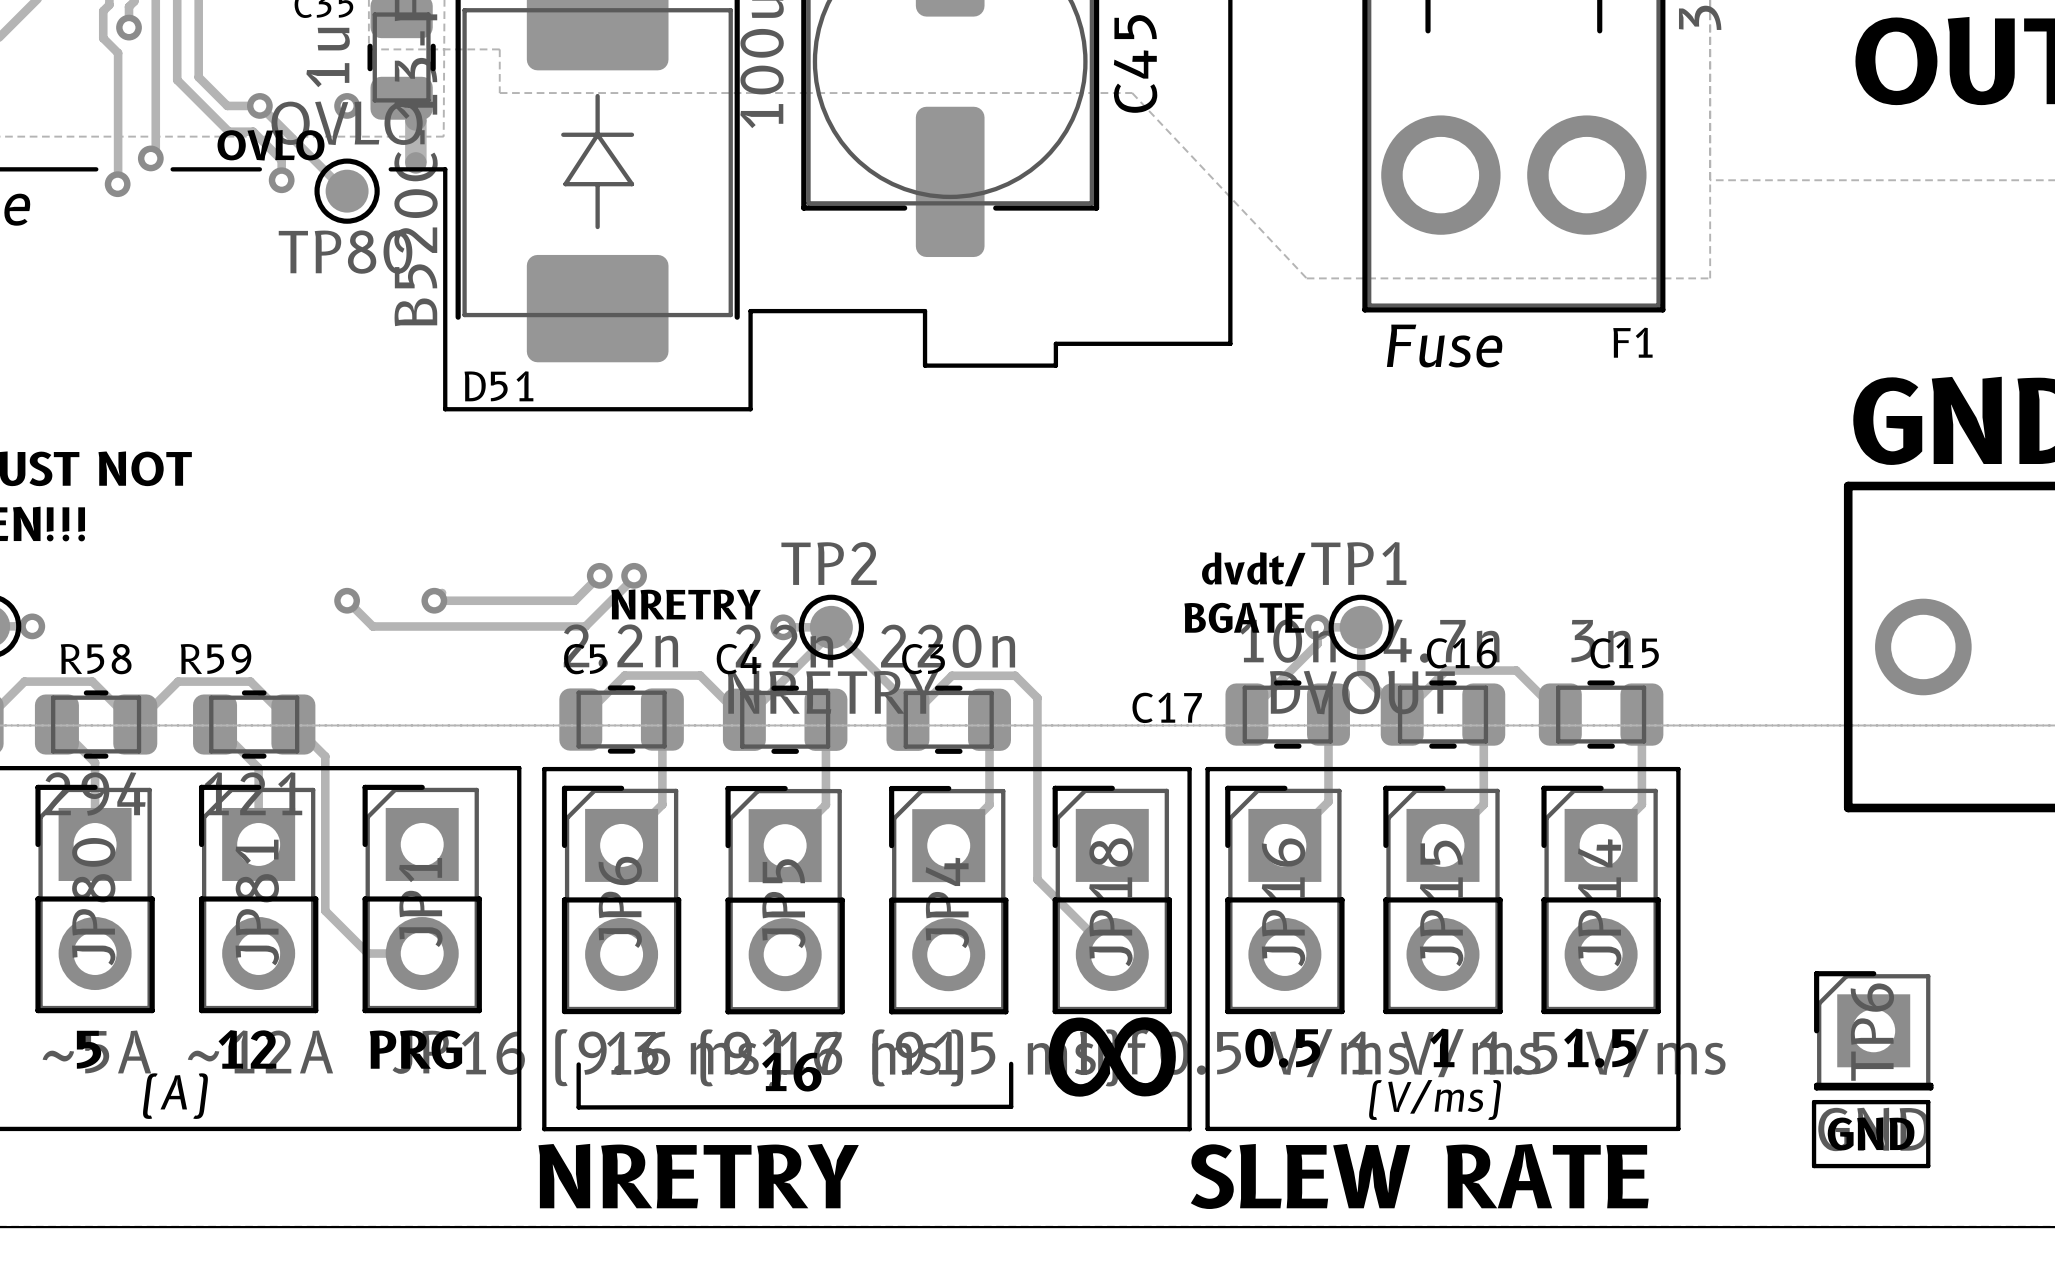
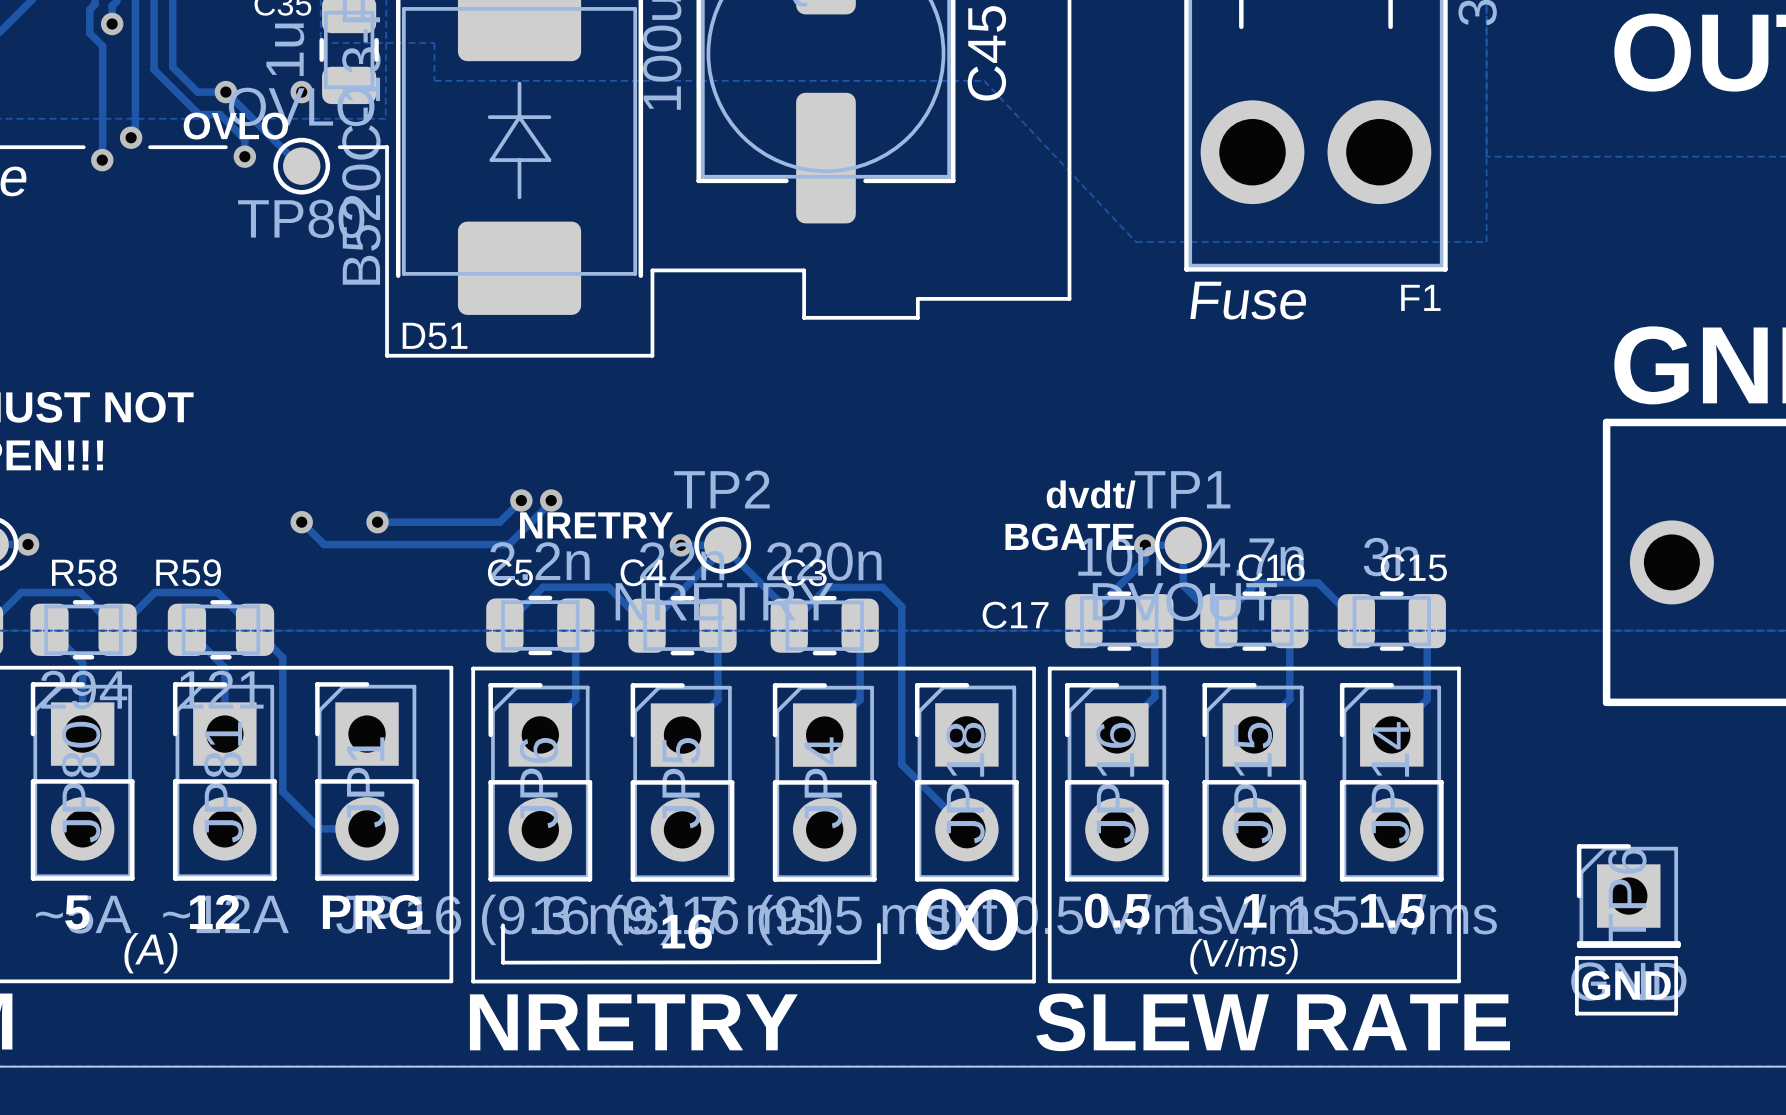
part: (415, 141) -> none

